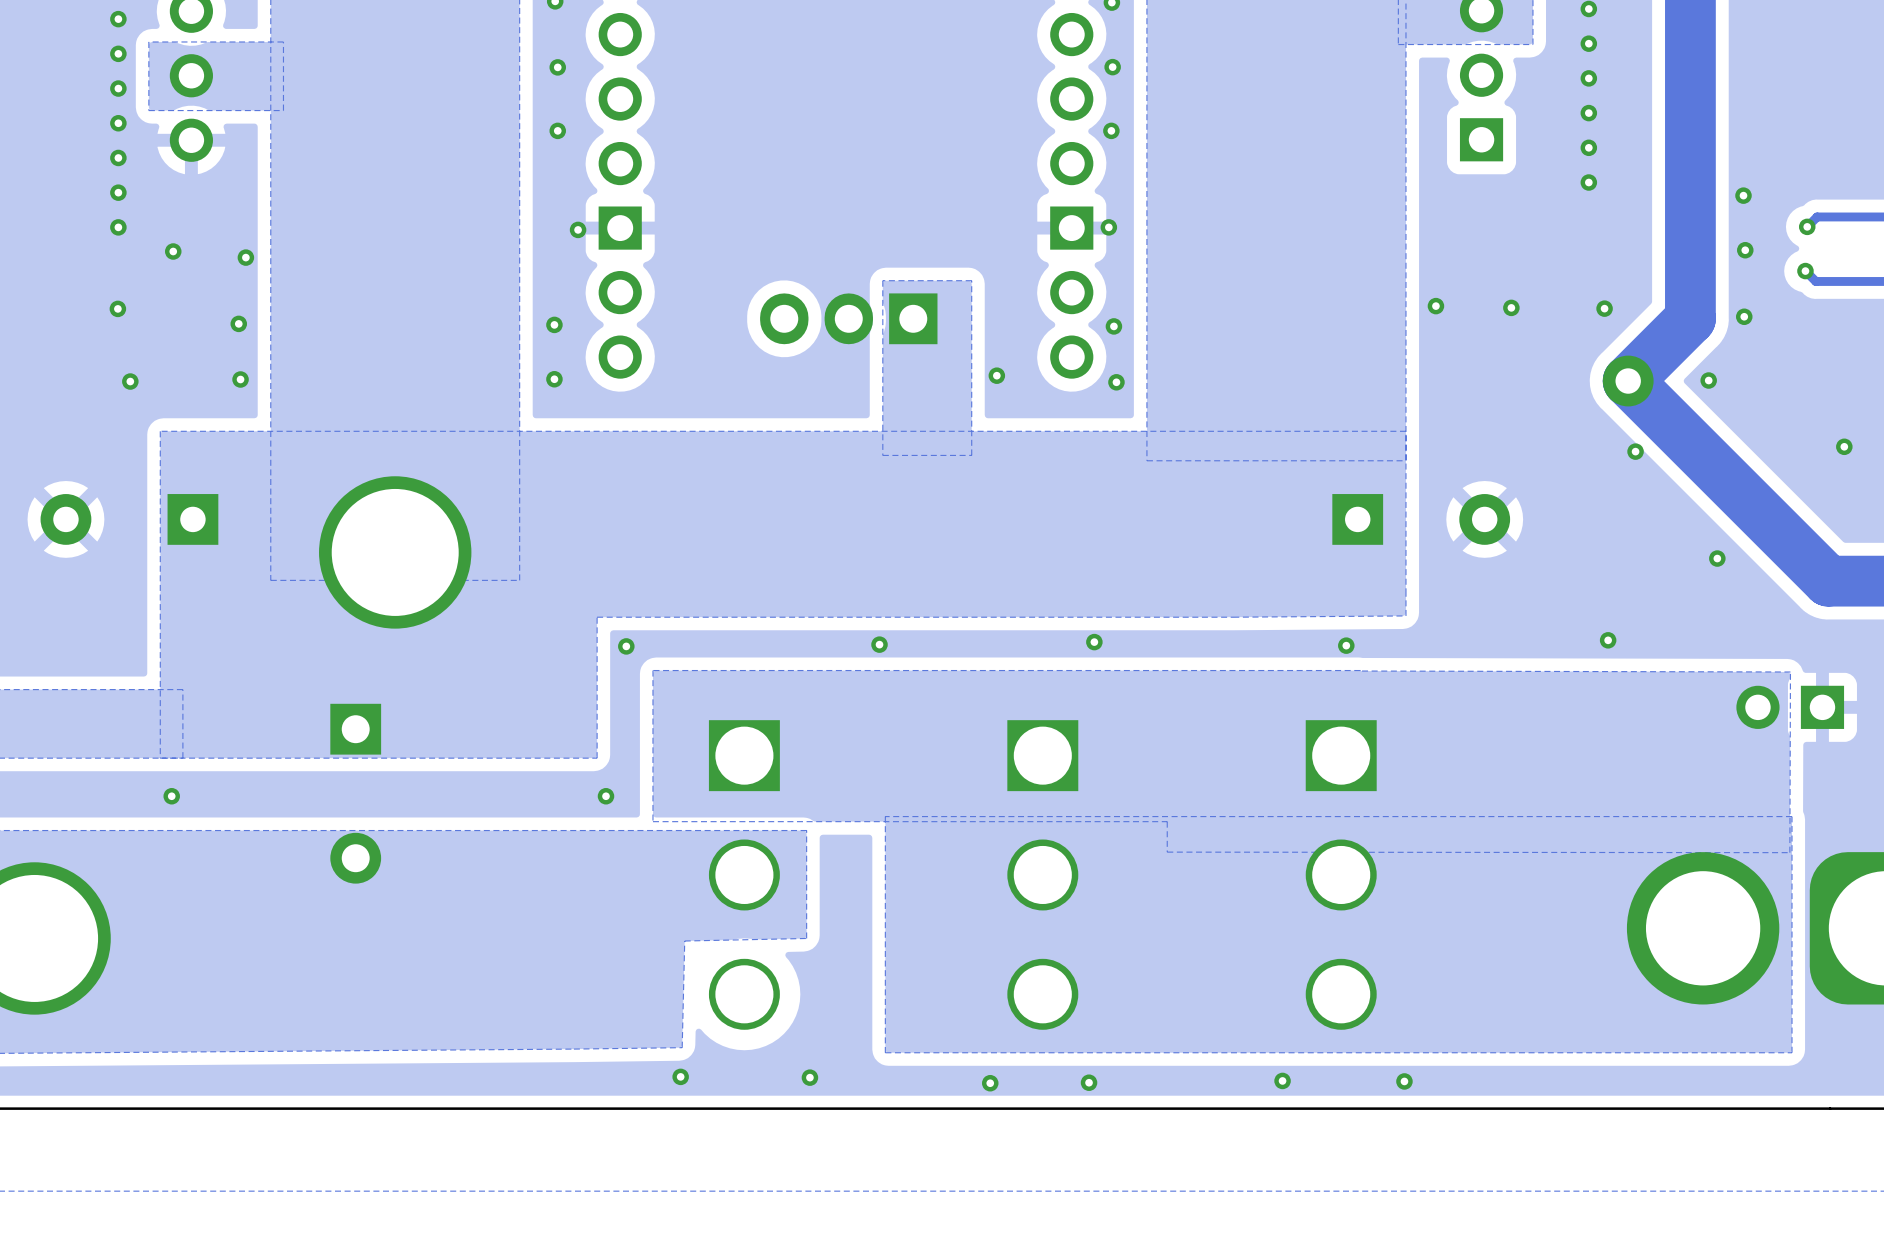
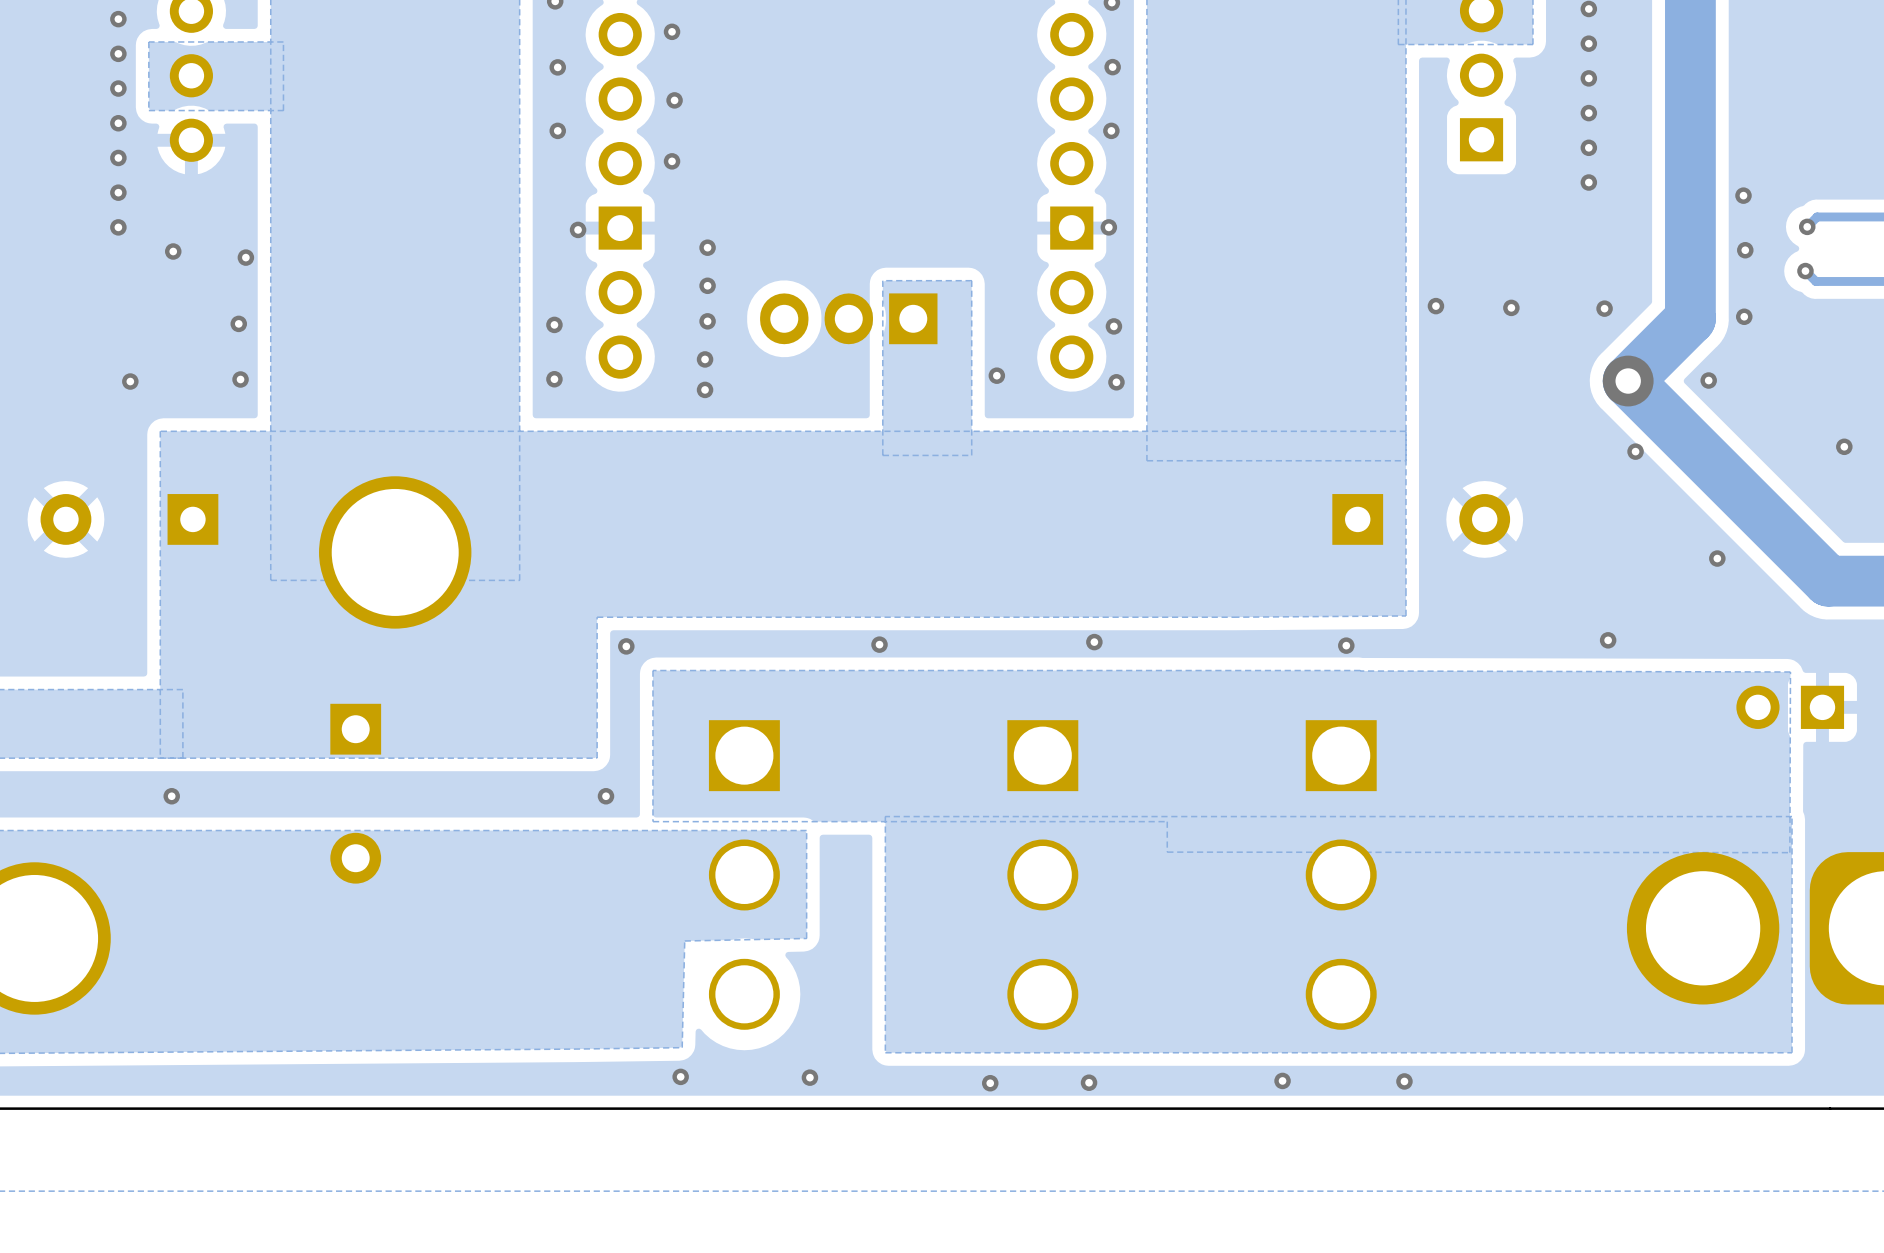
via: none -> (672, 31)
via: none -> (674, 100)
via: none -> (672, 161)
via: none -> (707, 247)
via: none -> (707, 285)
via: (117, 308) -> none
via: none -> (707, 321)
via: none -> (705, 359)
via: none -> (705, 389)

